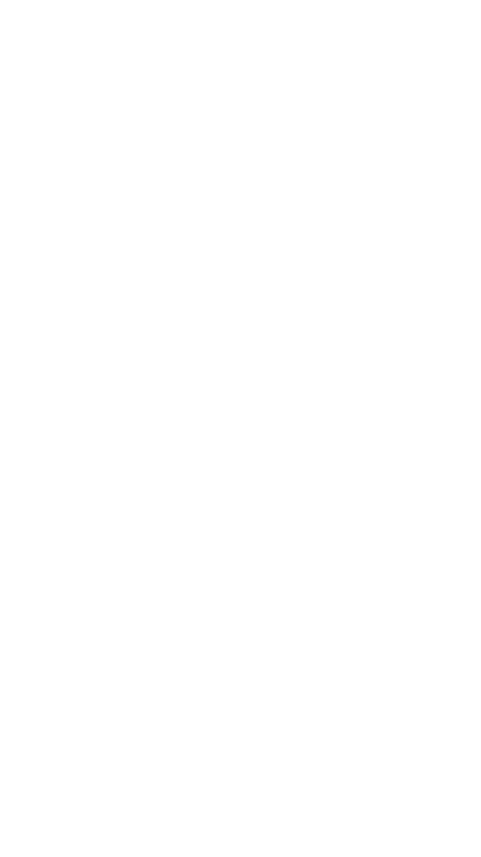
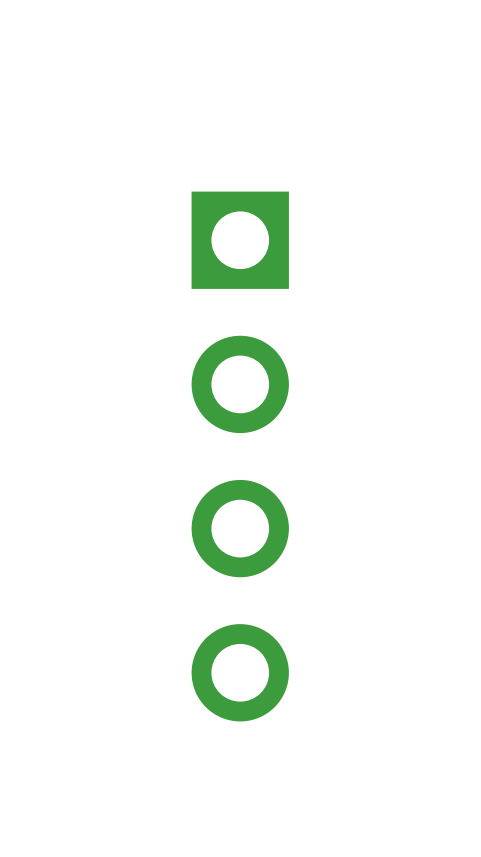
part: none -> (240, 456)

